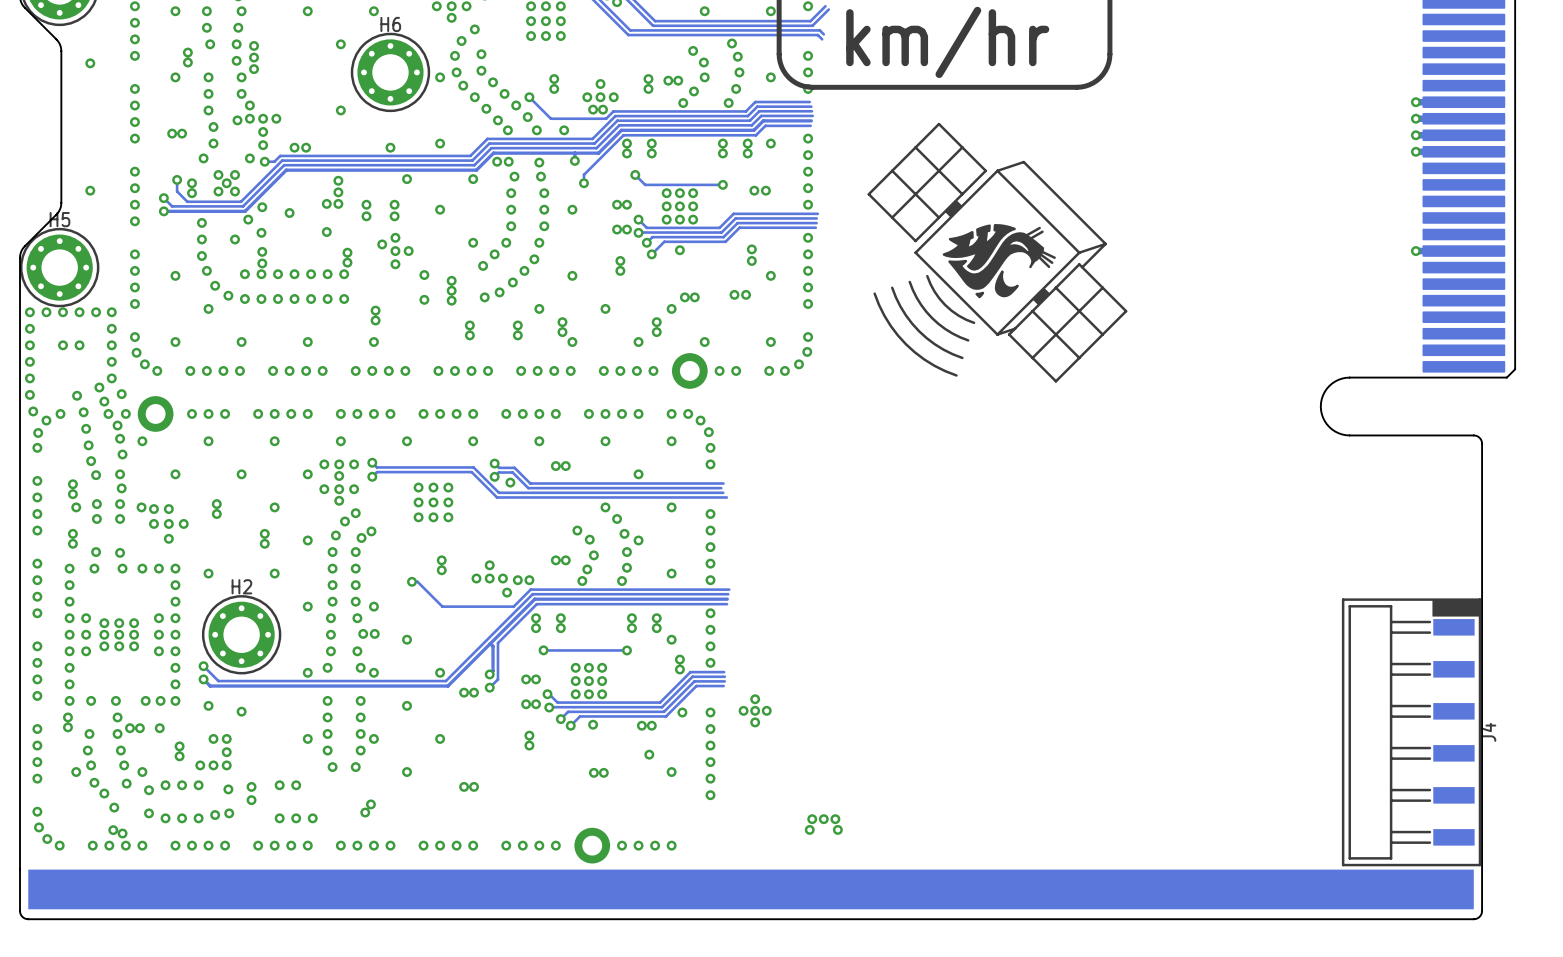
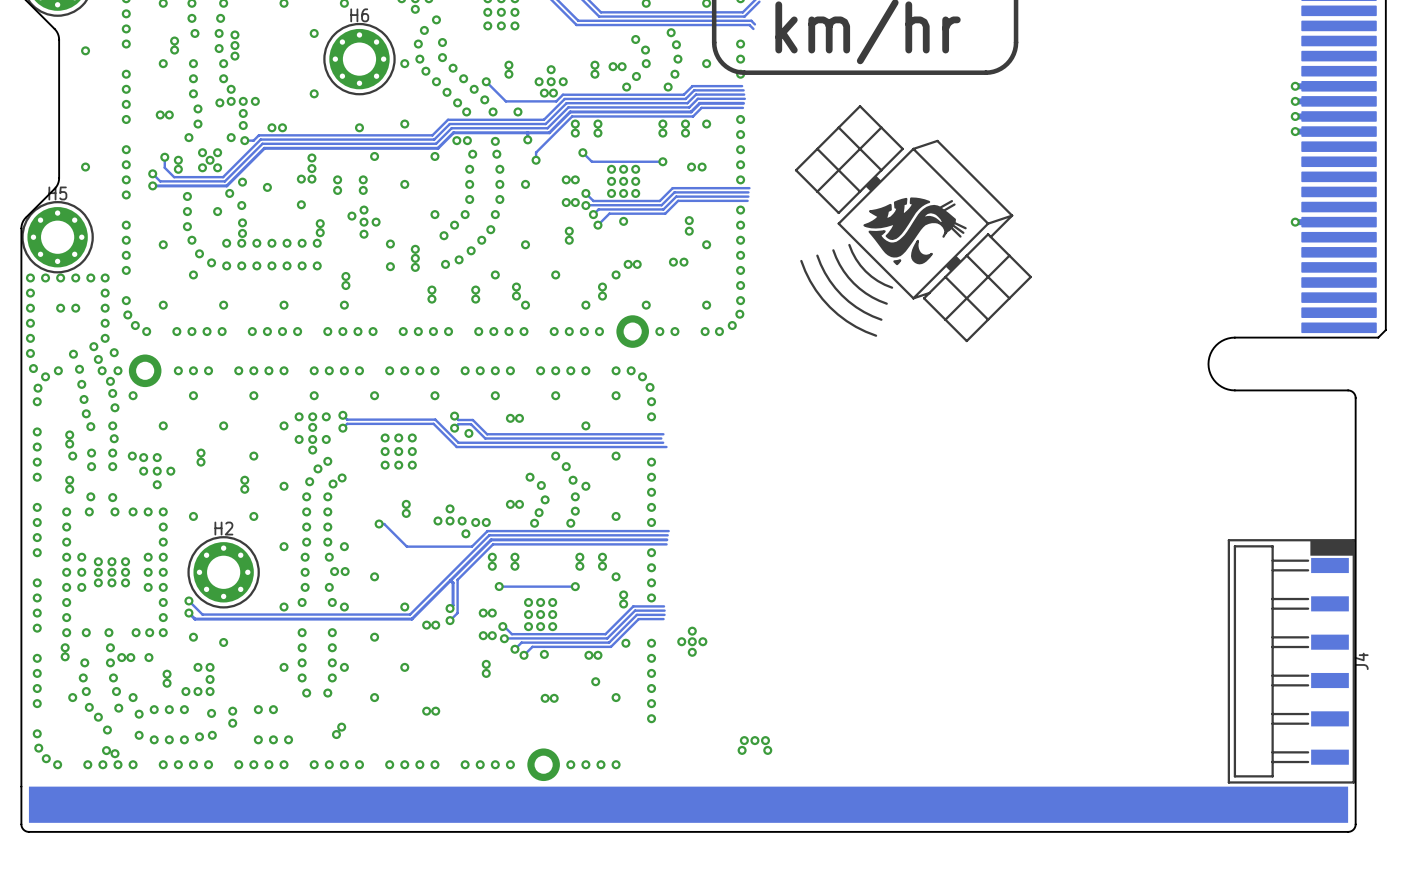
via: none -> (740, 285)

